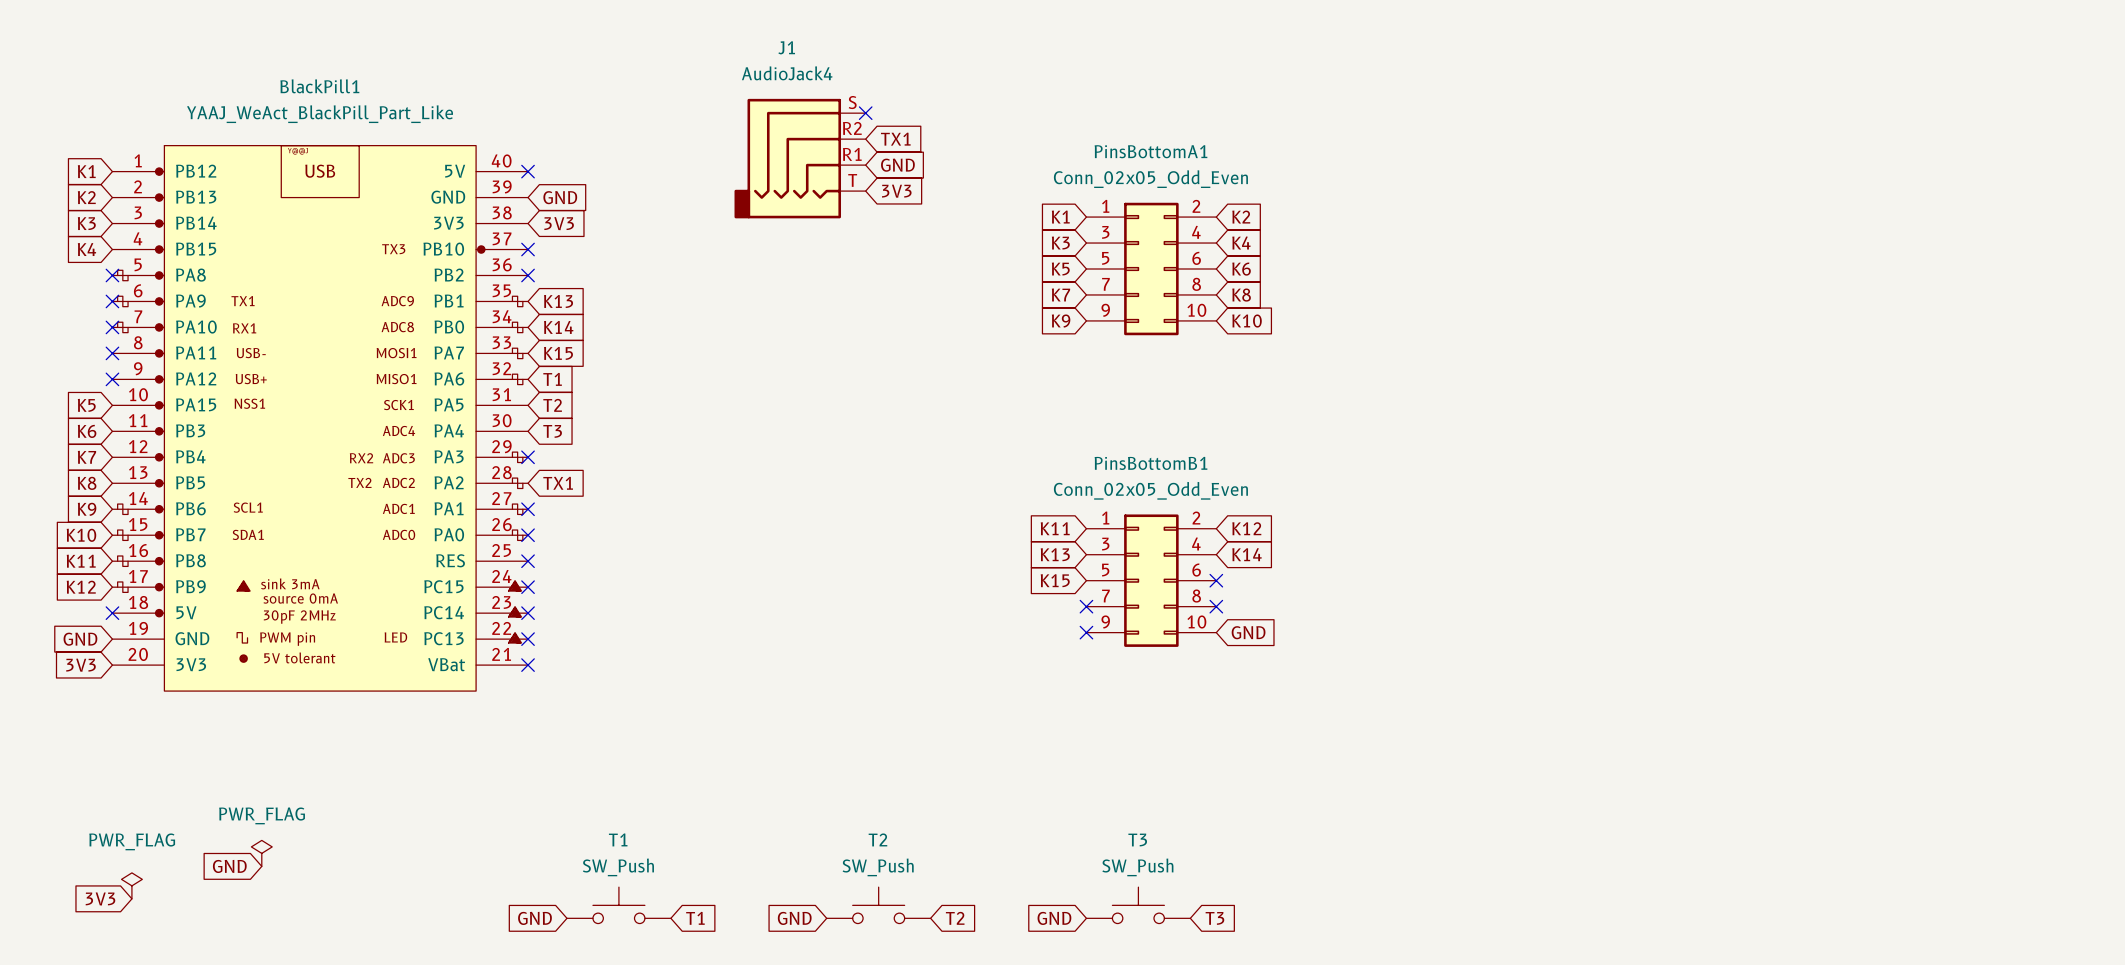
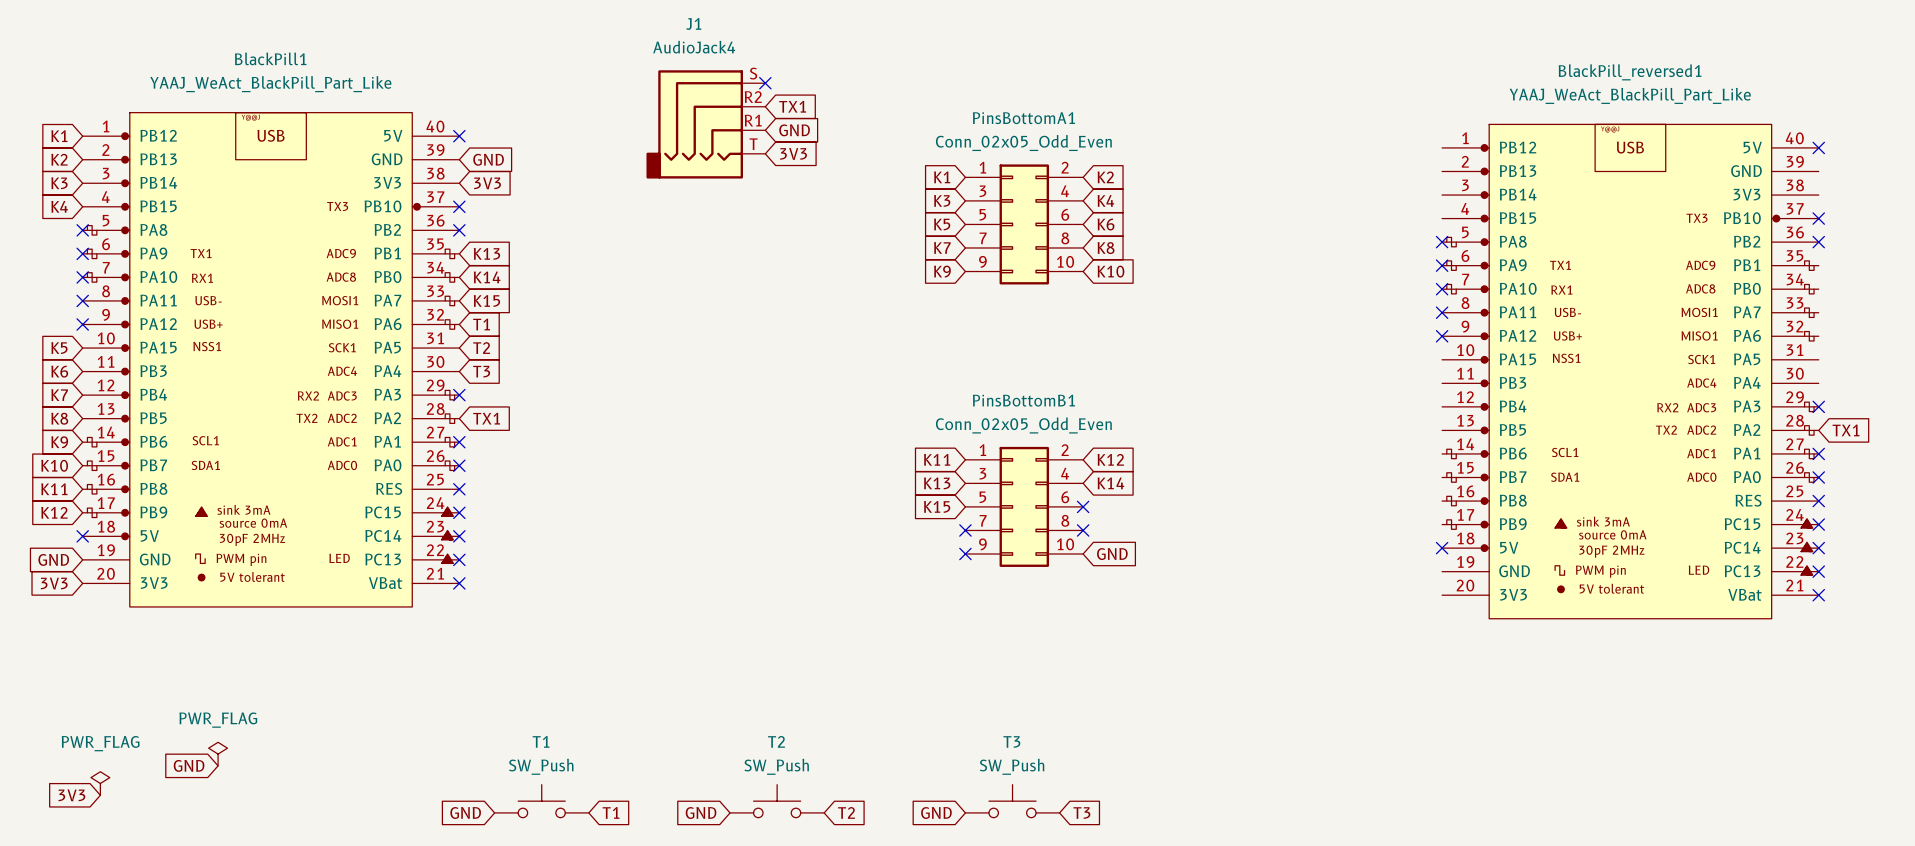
no-connect mark: none -> (1818, 147)
no-connect mark: none -> (1818, 218)
no-connect mark: none -> (1442, 242)
no-connect mark: none -> (1818, 242)
no-connect mark: none -> (1442, 265)
no-connect mark: none -> (1442, 289)
no-connect mark: none -> (1442, 312)
no-connect mark: none -> (1442, 336)
BlackPill_reversed1: none -> YAAJ_WeAct_BlackPill_Part_Like (1630, 371)
no-connect mark: none -> (1818, 406)
global label: none -> TX1 (1846, 430)
no-connect mark: none -> (1818, 453)
no-connect mark: none -> (1818, 477)
no-connect mark: none -> (1818, 501)
no-connect mark: none -> (1818, 524)
no-connect mark: none -> (1442, 548)
no-connect mark: none -> (1818, 548)
no-connect mark: none -> (1818, 571)
no-connect mark: none -> (1818, 595)

